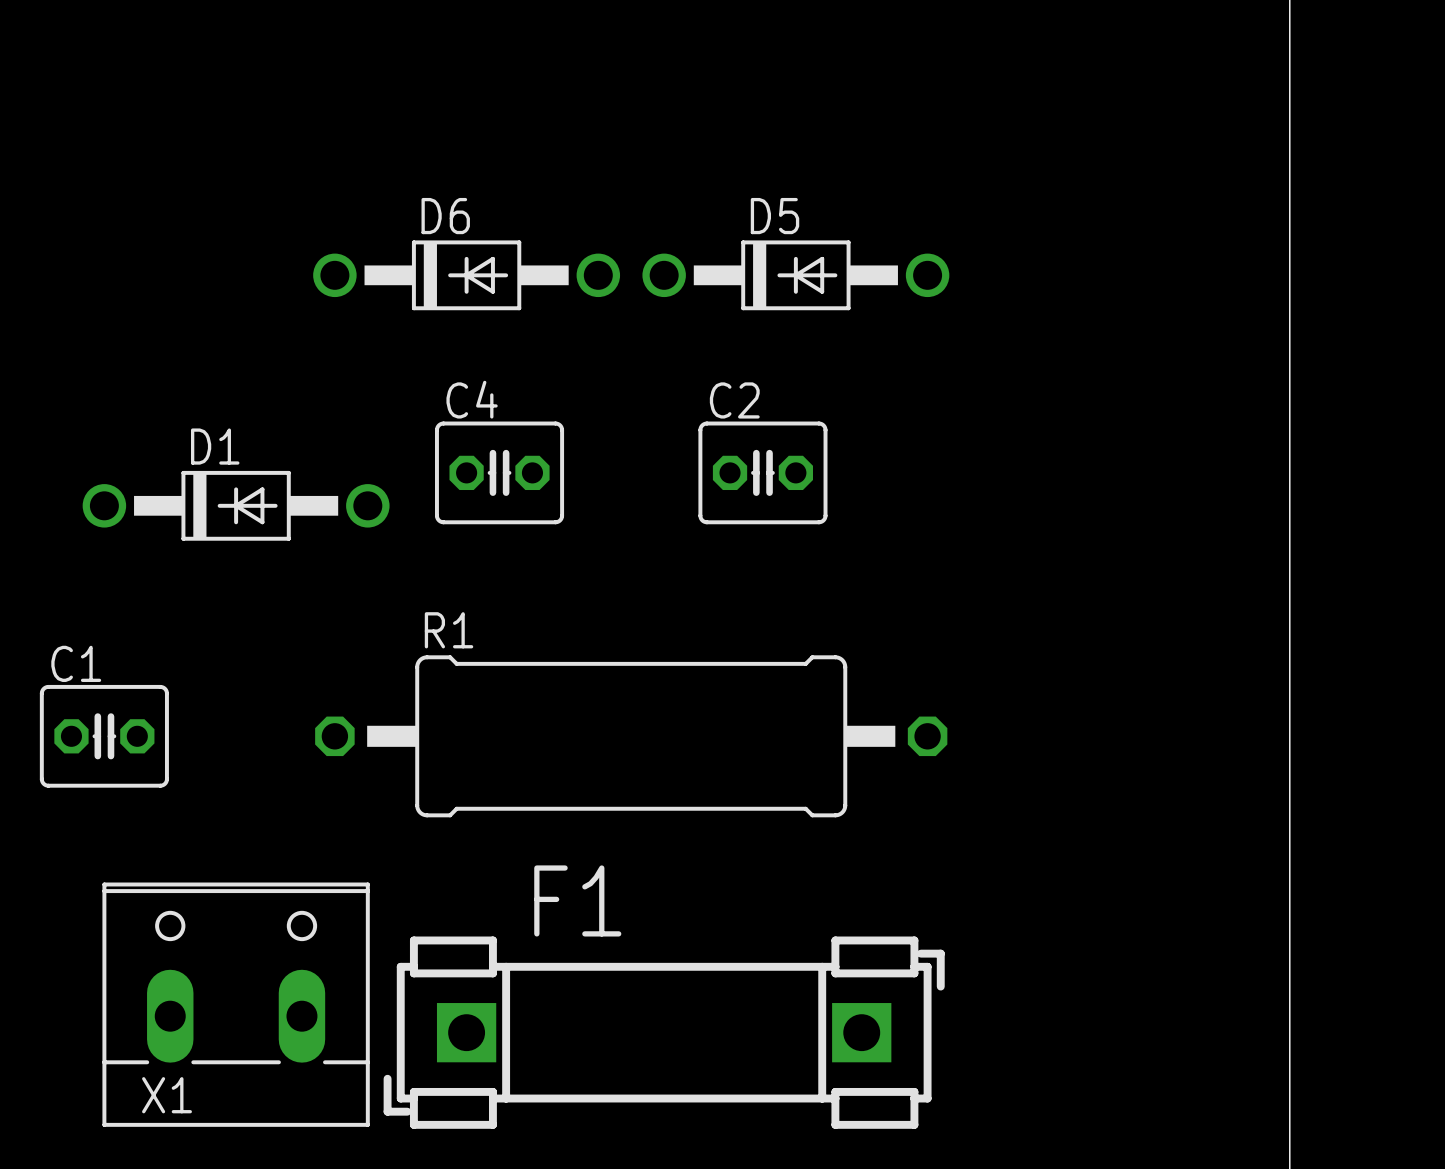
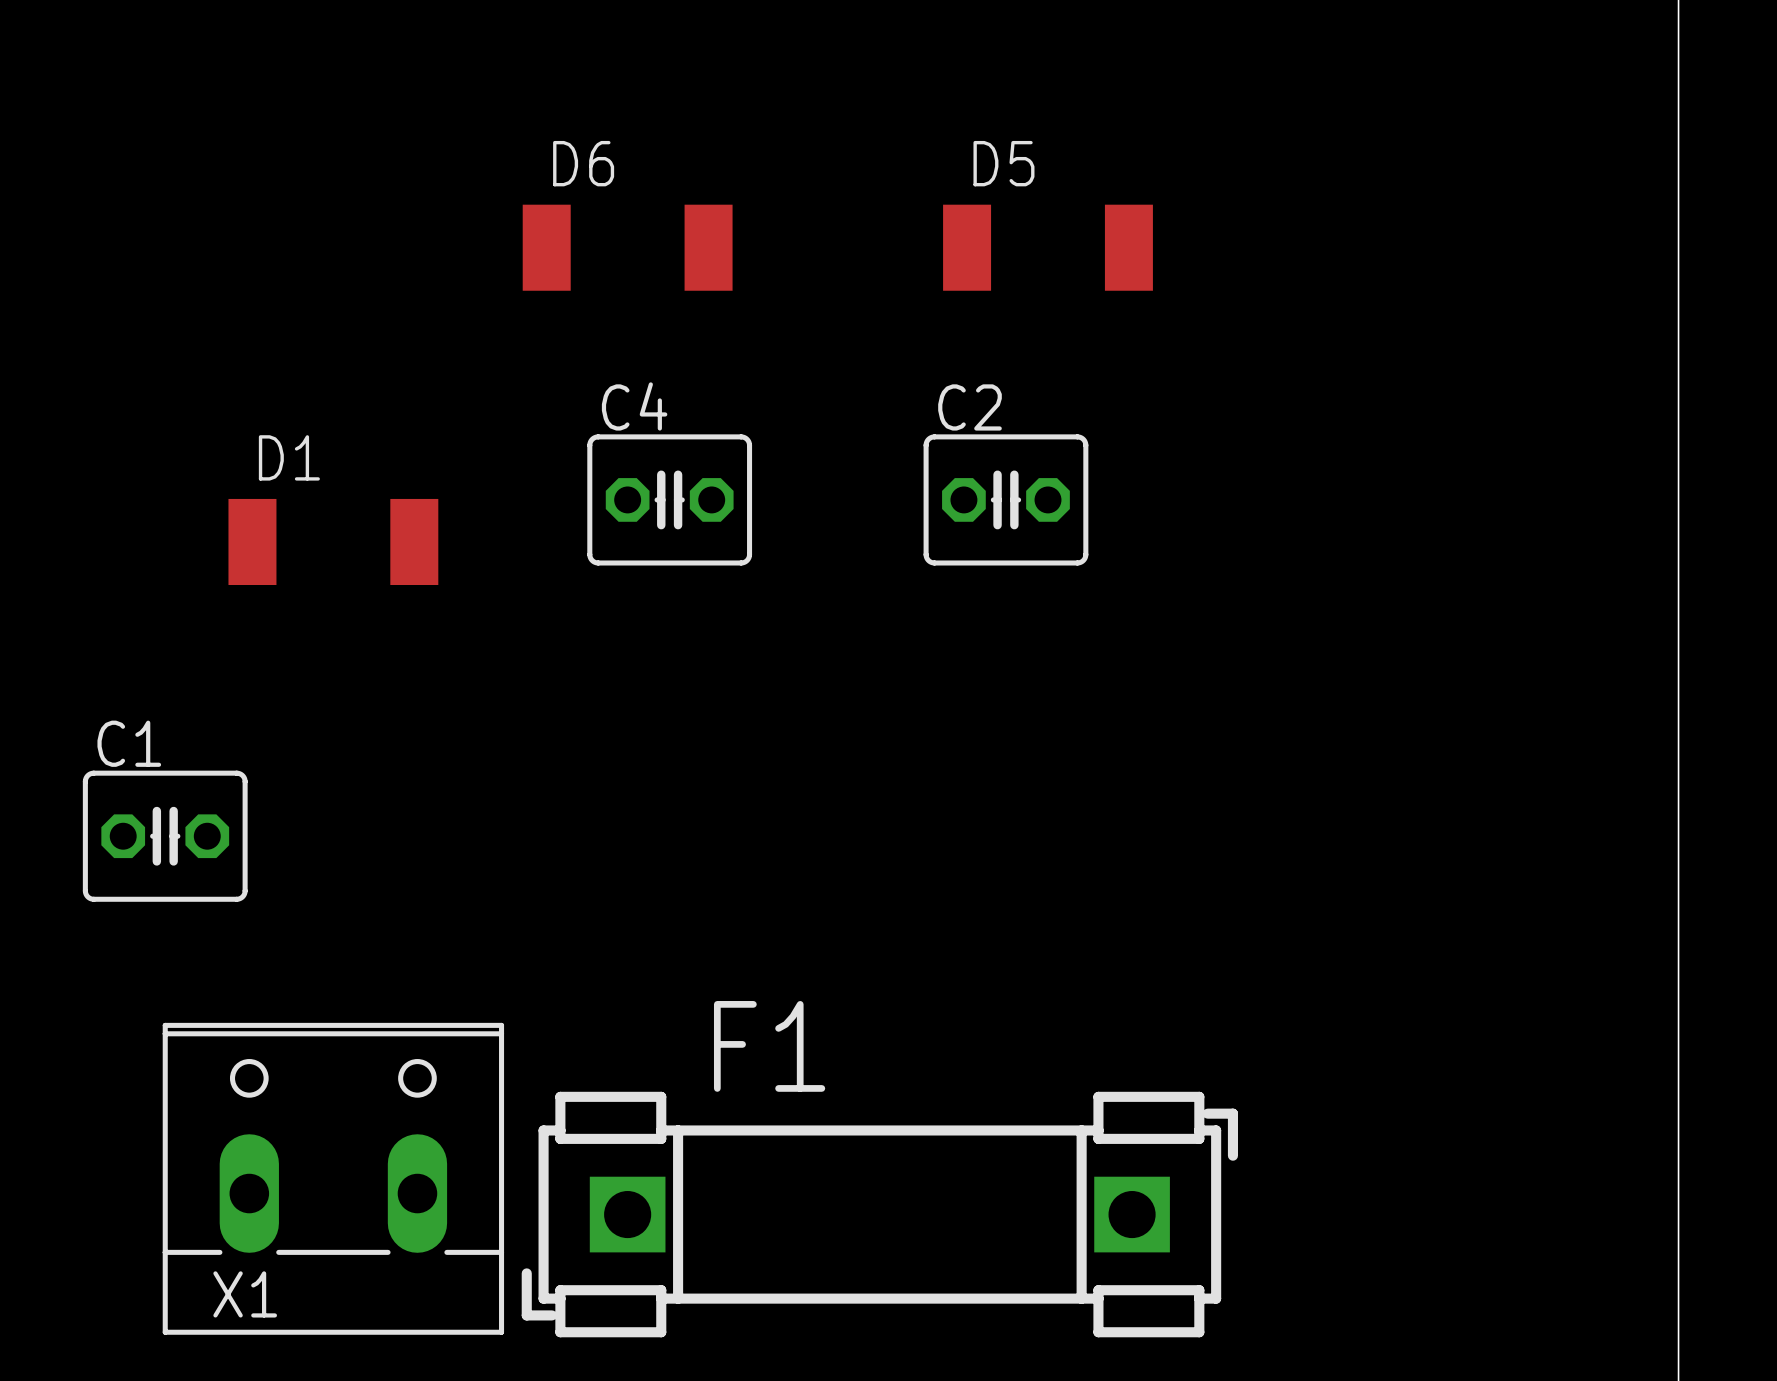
D6 footprint: [313, 240, 621, 311] -> [522, 204, 733, 291]
D5 footprint: [642, 240, 950, 311] -> [943, 204, 1153, 291]
D1 footprint: [82, 470, 390, 541] -> [228, 498, 439, 586]
R1: (631, 736) -> none

